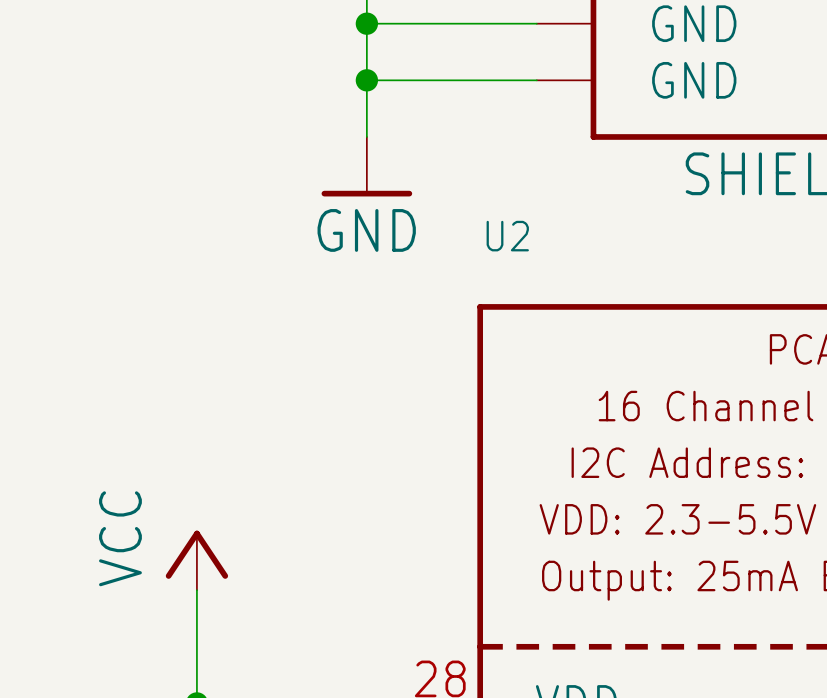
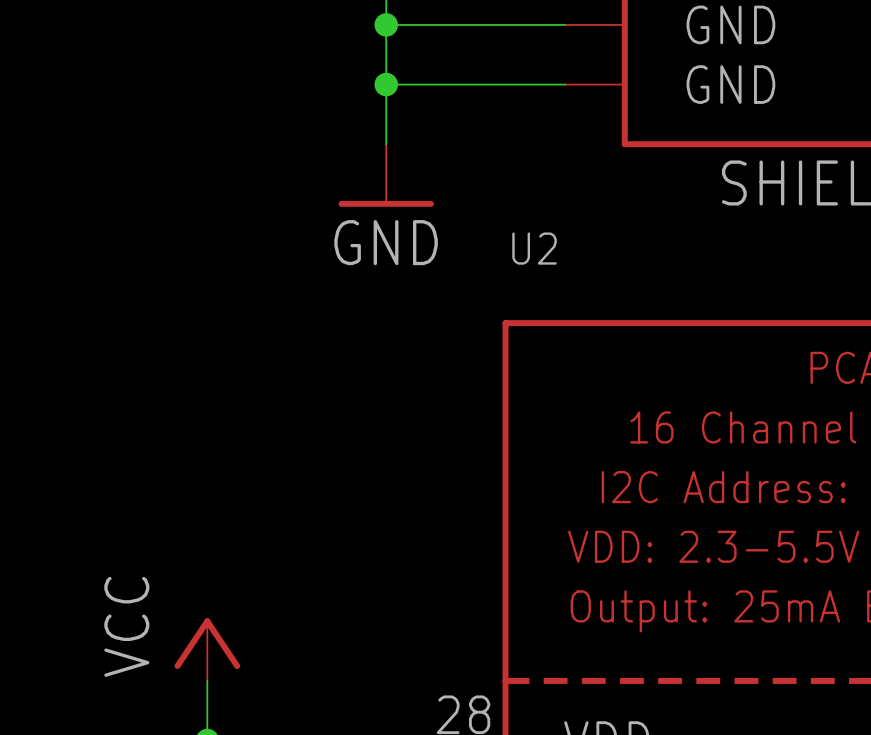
power symbol position: VCC (196, 560) -> VCC (207, 649)

